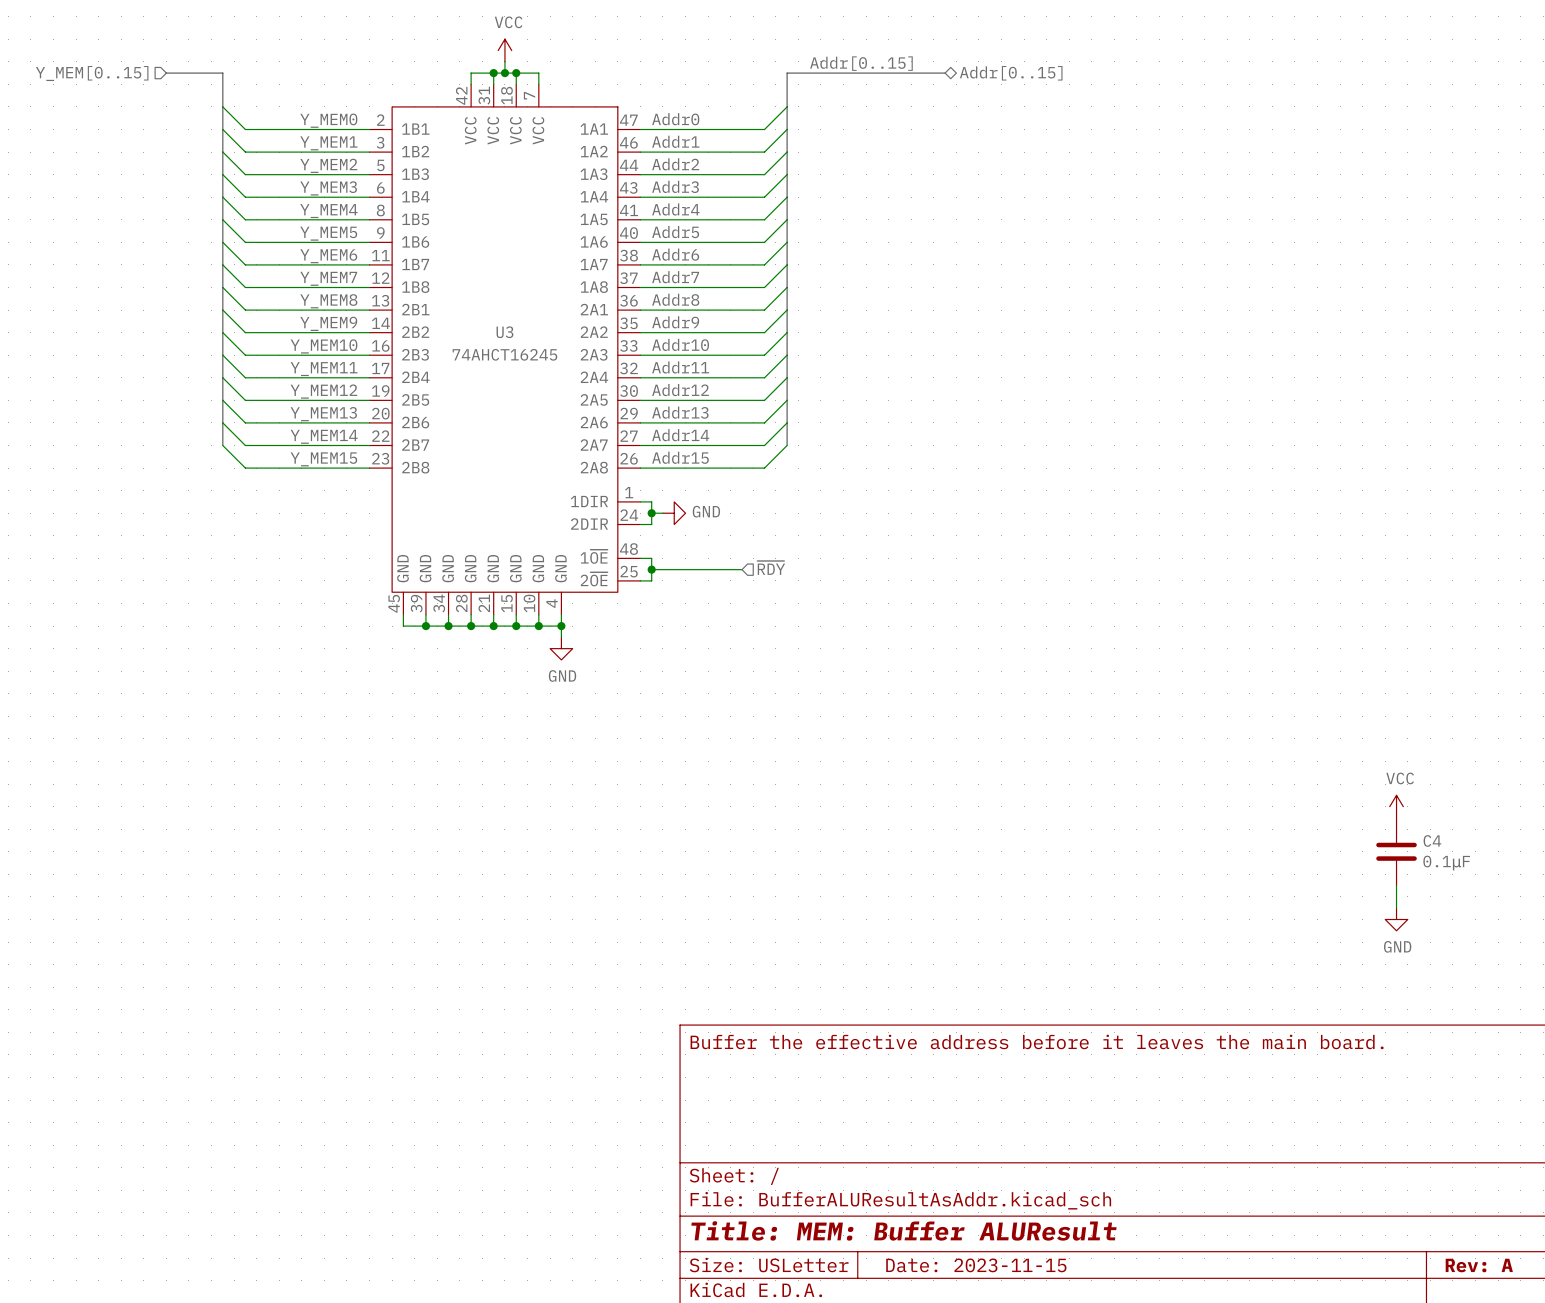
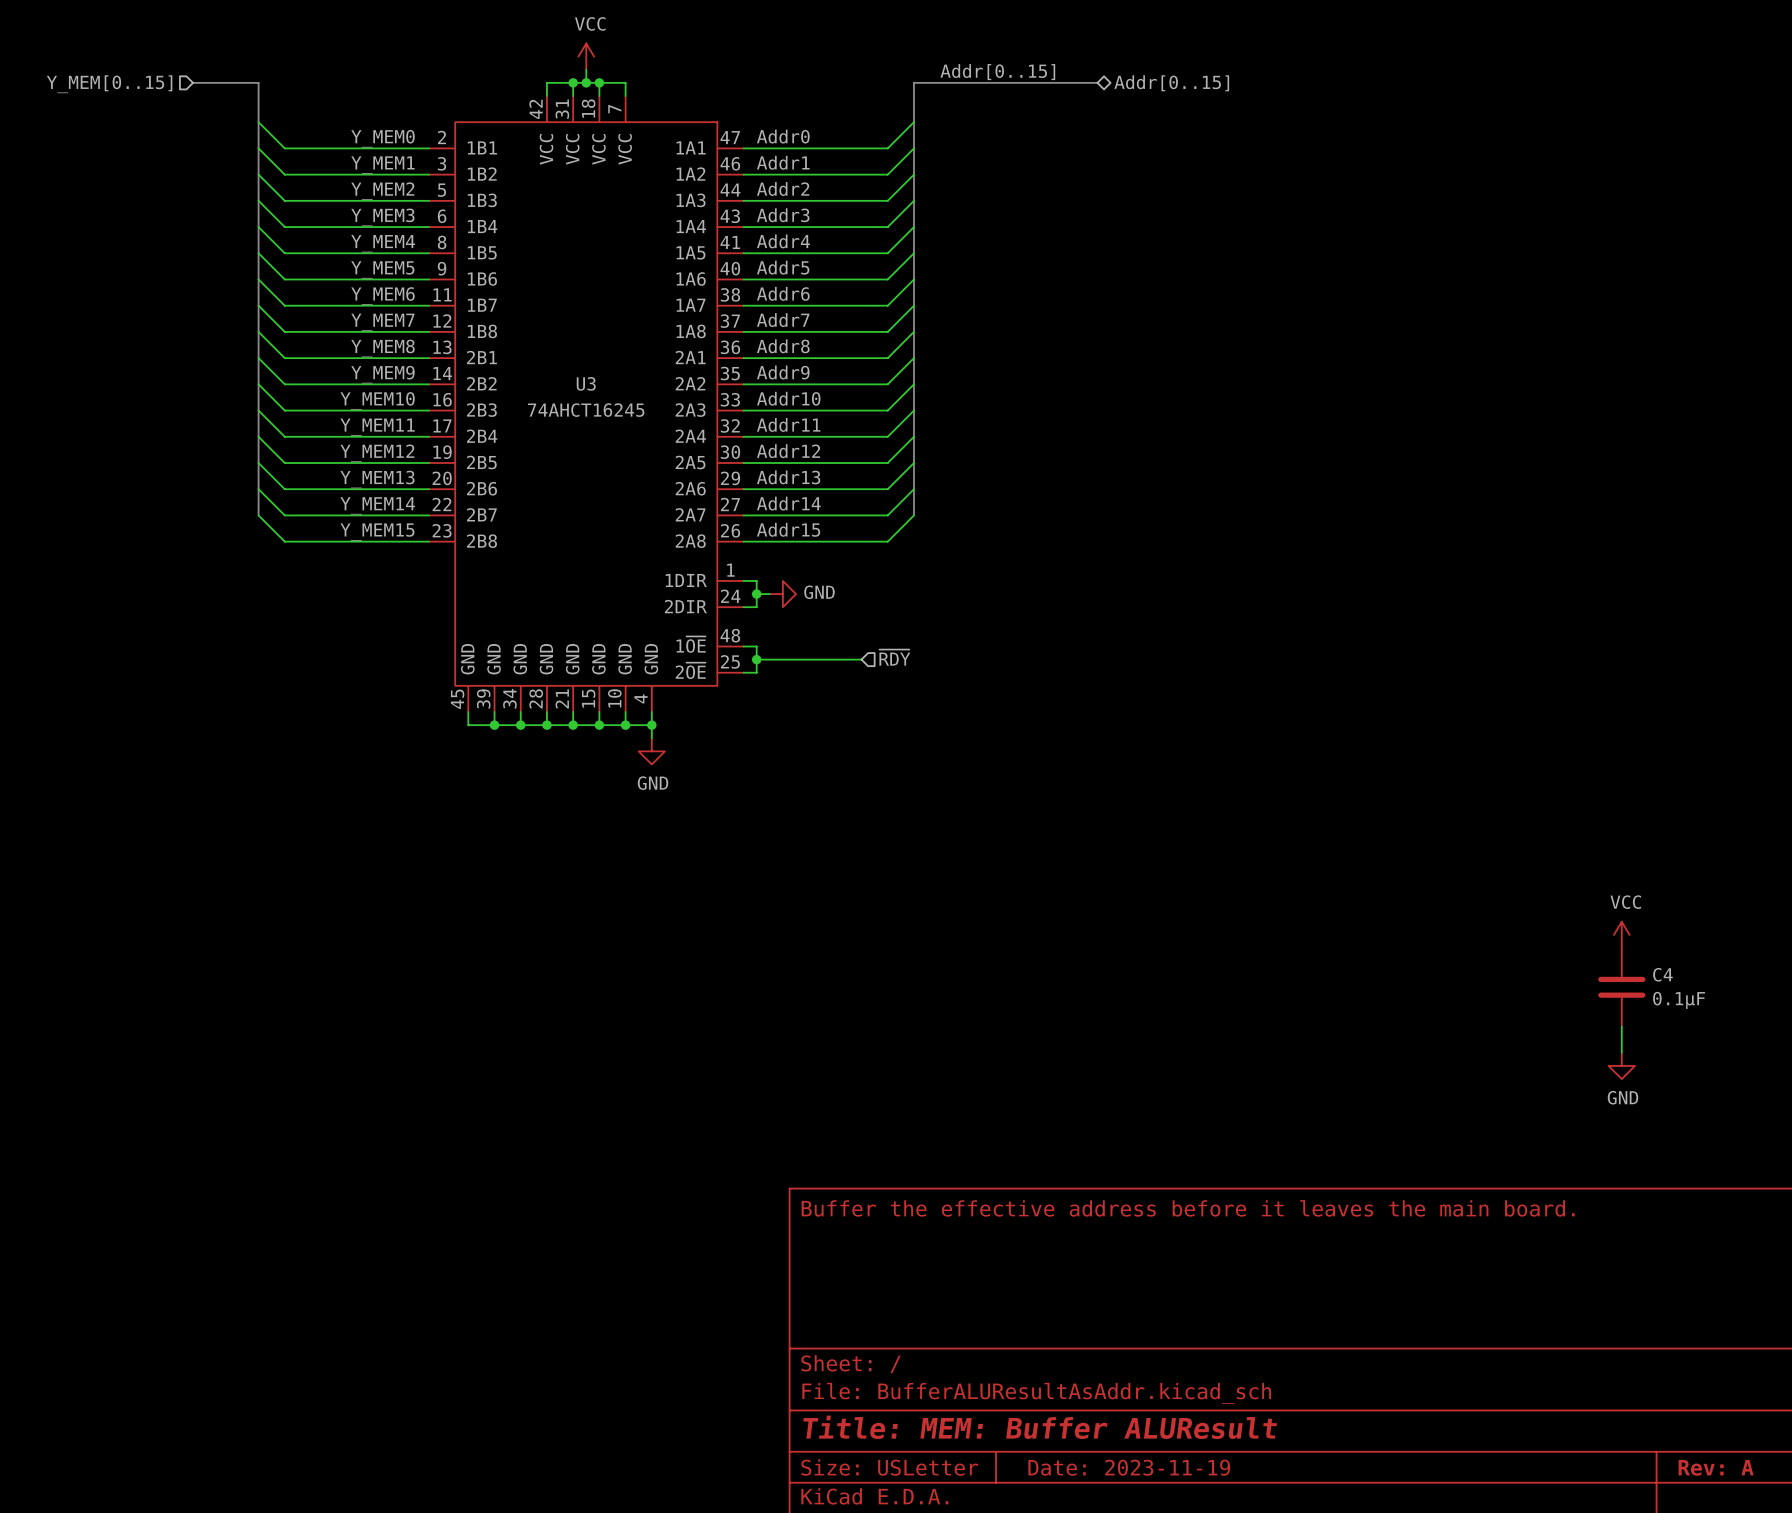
title block: Date: 2023-11-15 (976, 1265) -> Date: 2023-11-19 (1129, 1467)

